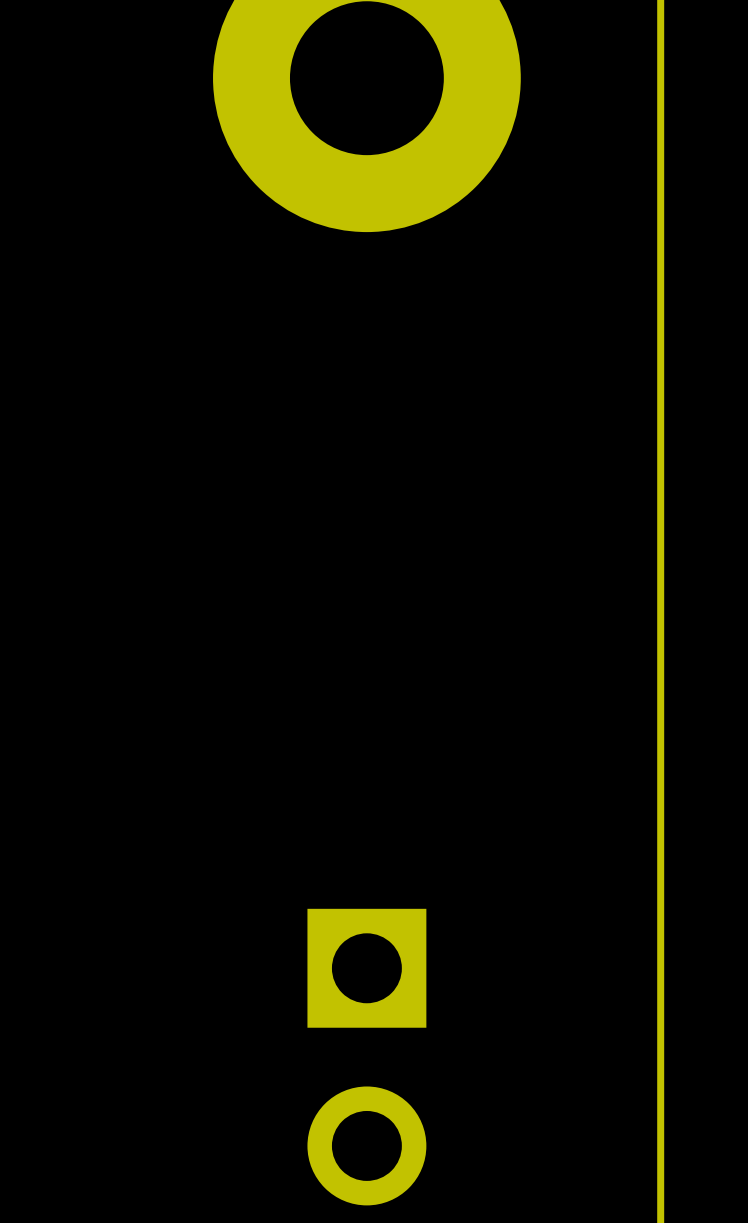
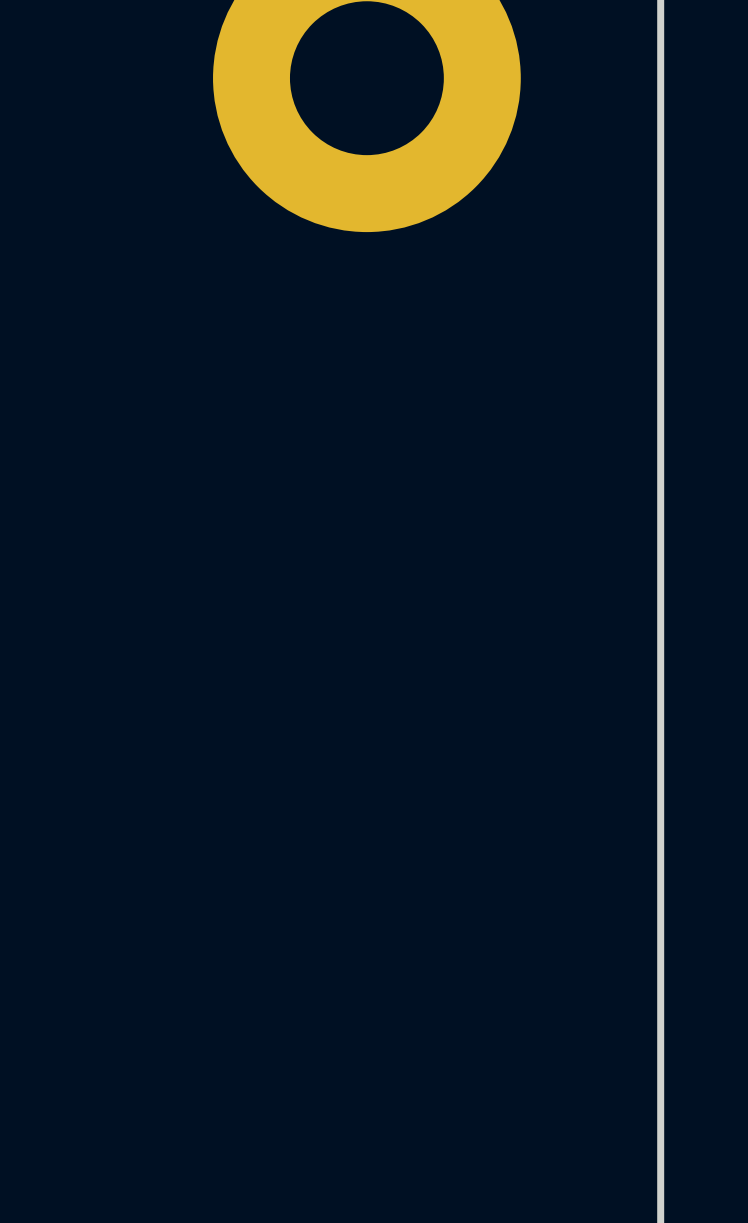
part: (366, 1057) -> none

